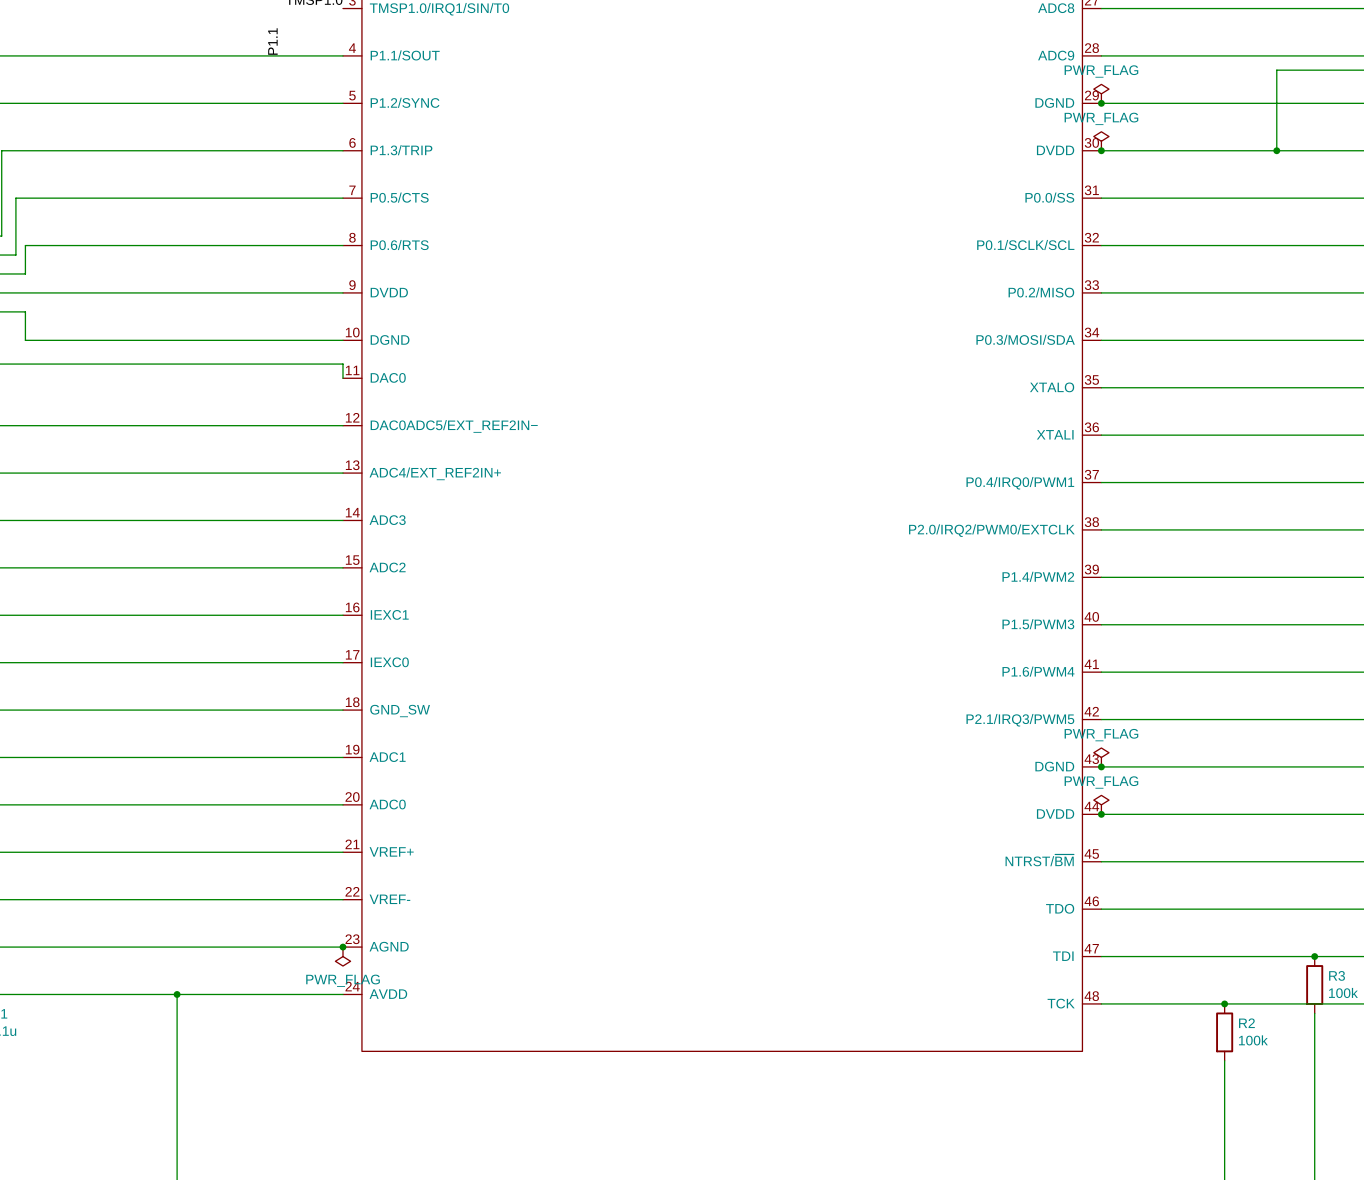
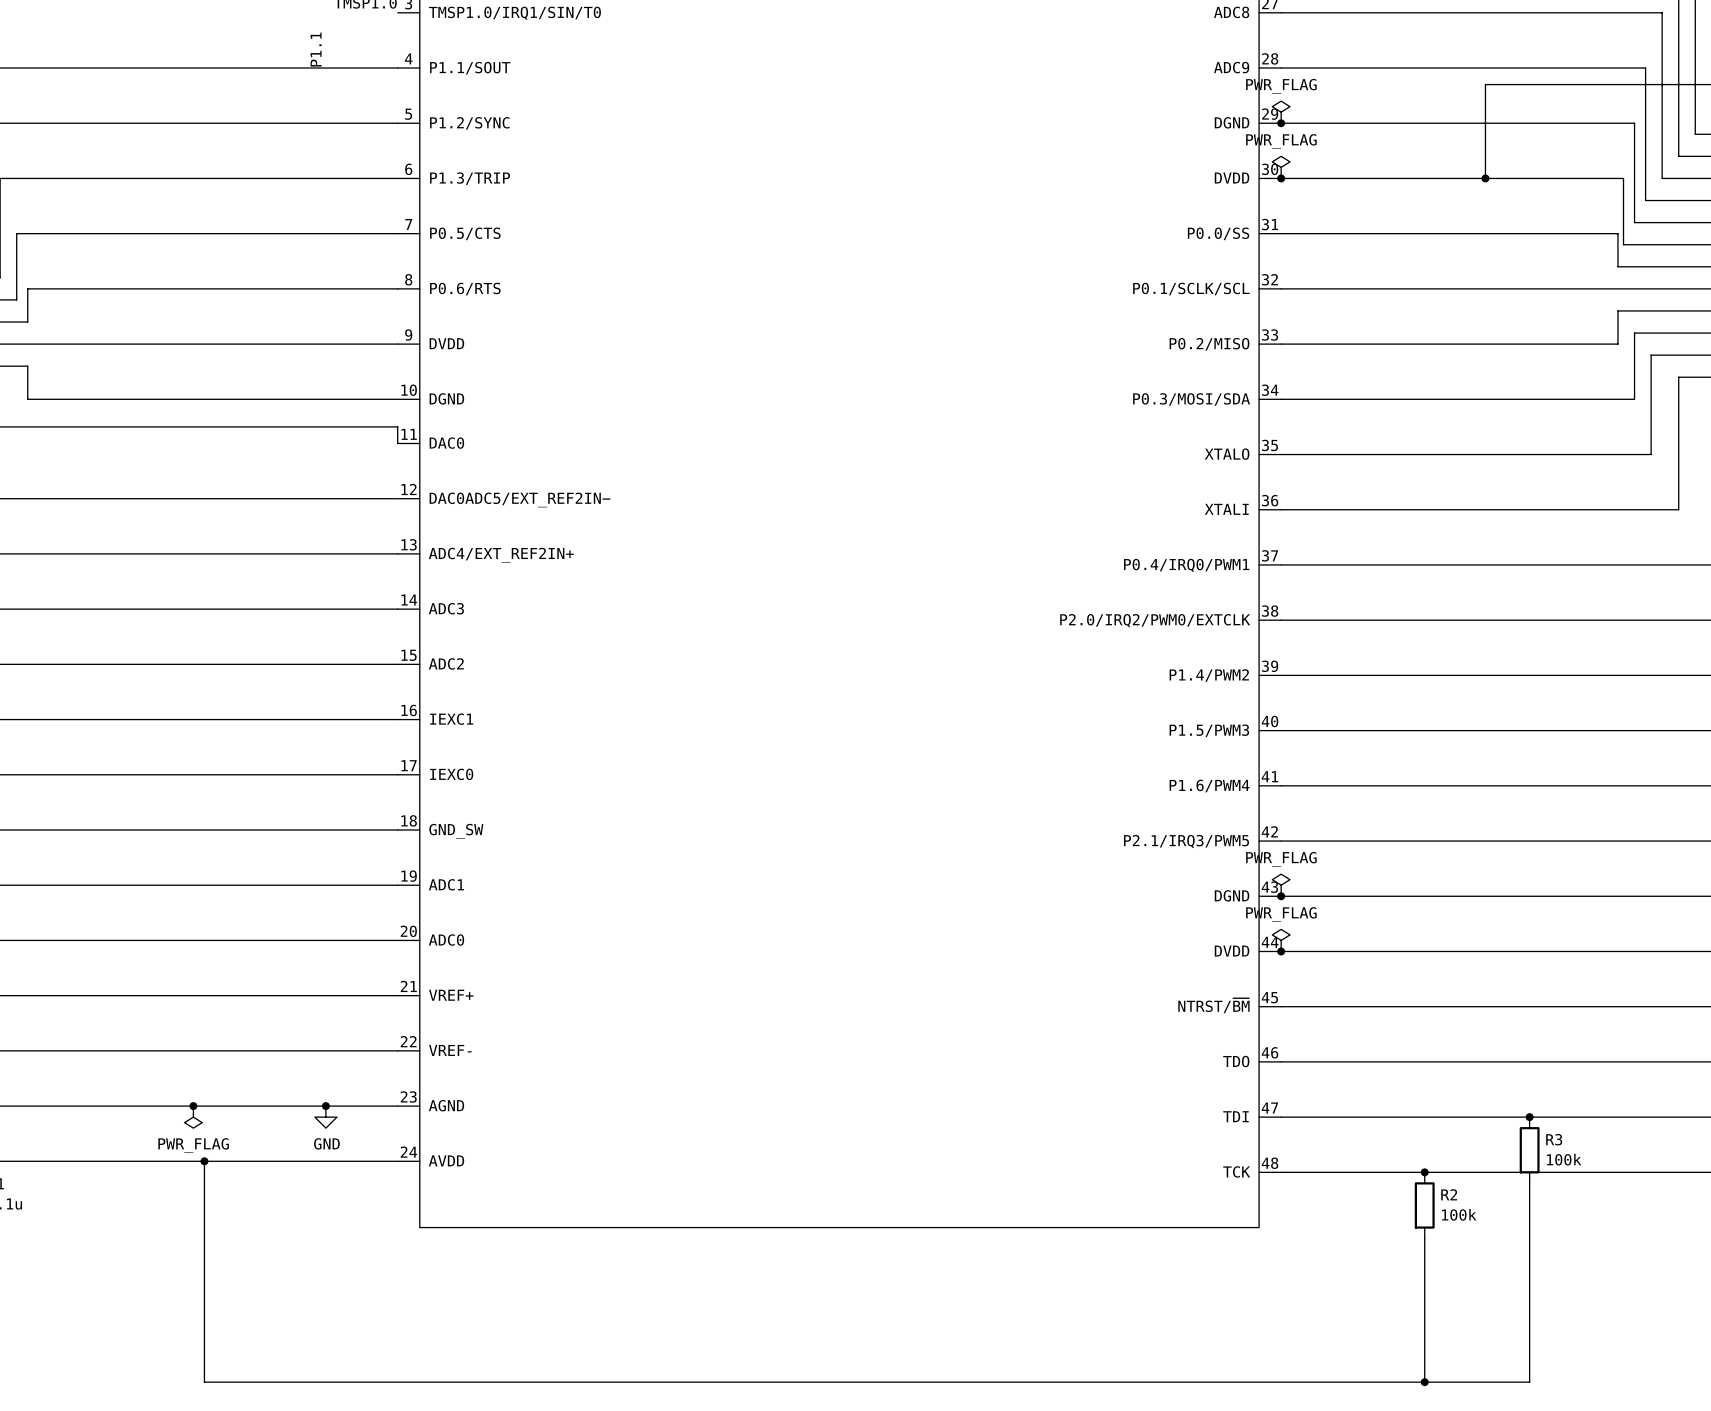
junction: none -> (193, 1106)
junction: none -> (325, 1106)
junction: (342, 947) -> none
power symbol: none -> GND (325, 1117)
power symbol position: PWR_FLAG (342, 956) -> PWR_FLAG (193, 1117)

